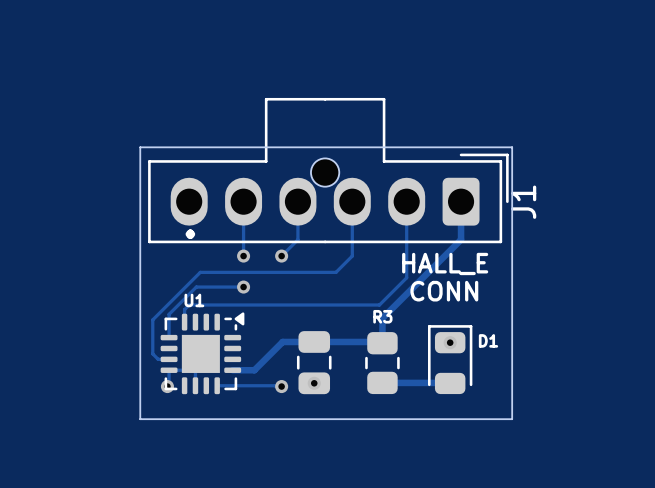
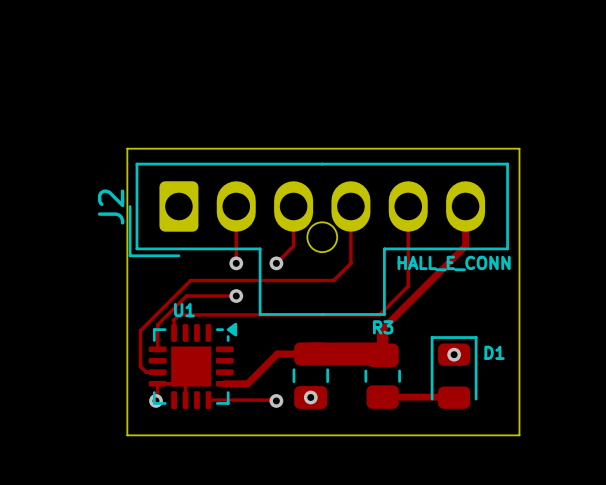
J1: (328, 170) -> none
J2: none -> (318, 239)
text: . (190, 234) -> none
text: HALL_E (445, 263) -> HALL_E_CONN (454, 263)
text: CONN (444, 291) -> none
track width: thin (382, 323) (382, 343) (314, 341) -> thick (382, 334) (382, 355) (310, 353)

